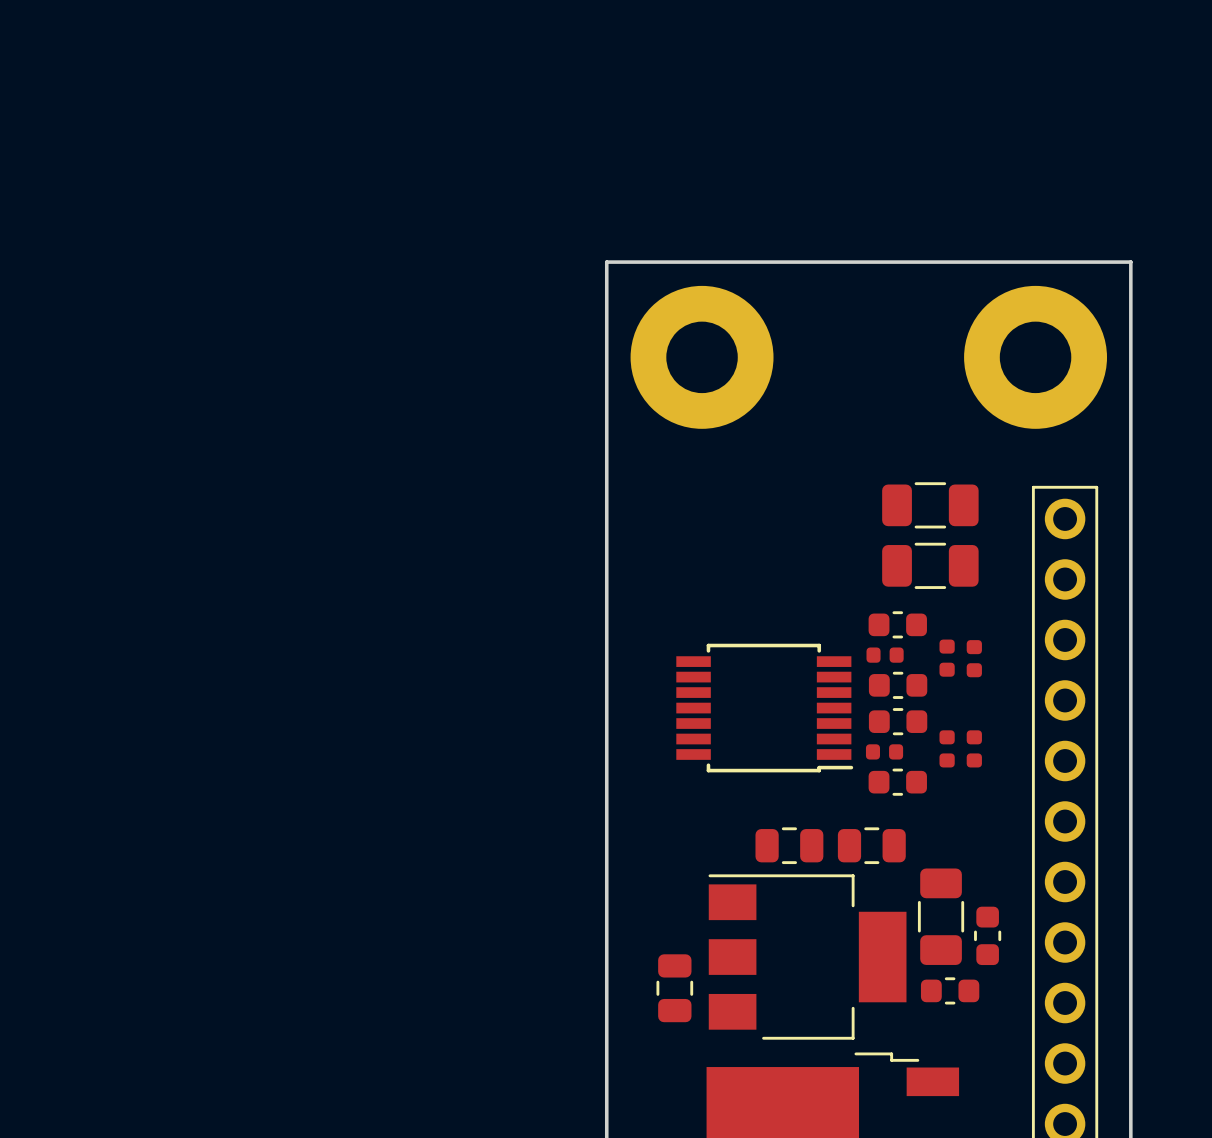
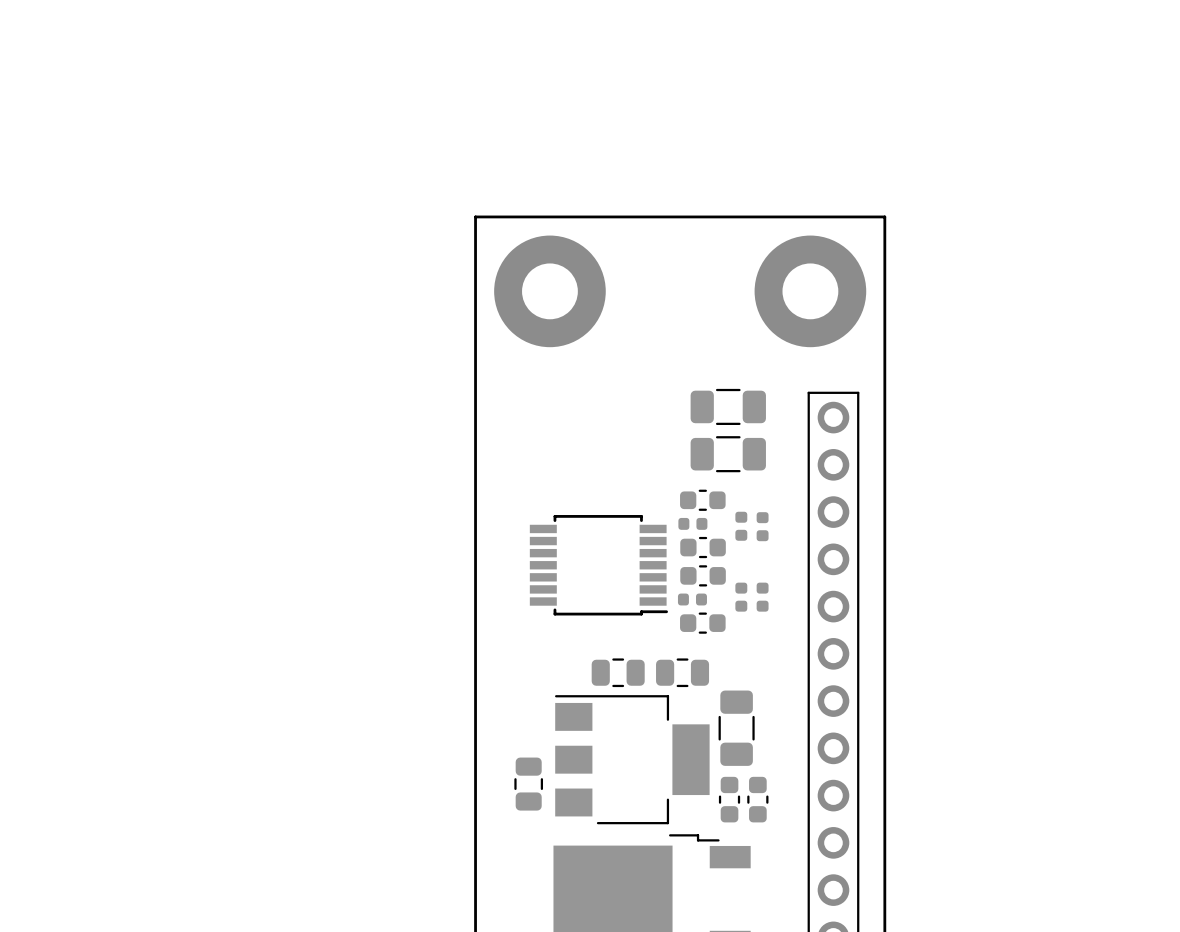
part: (987, 935) -> none
part: (950, 990) -> none
part: none -> (729, 799)
part: none -> (757, 799)

